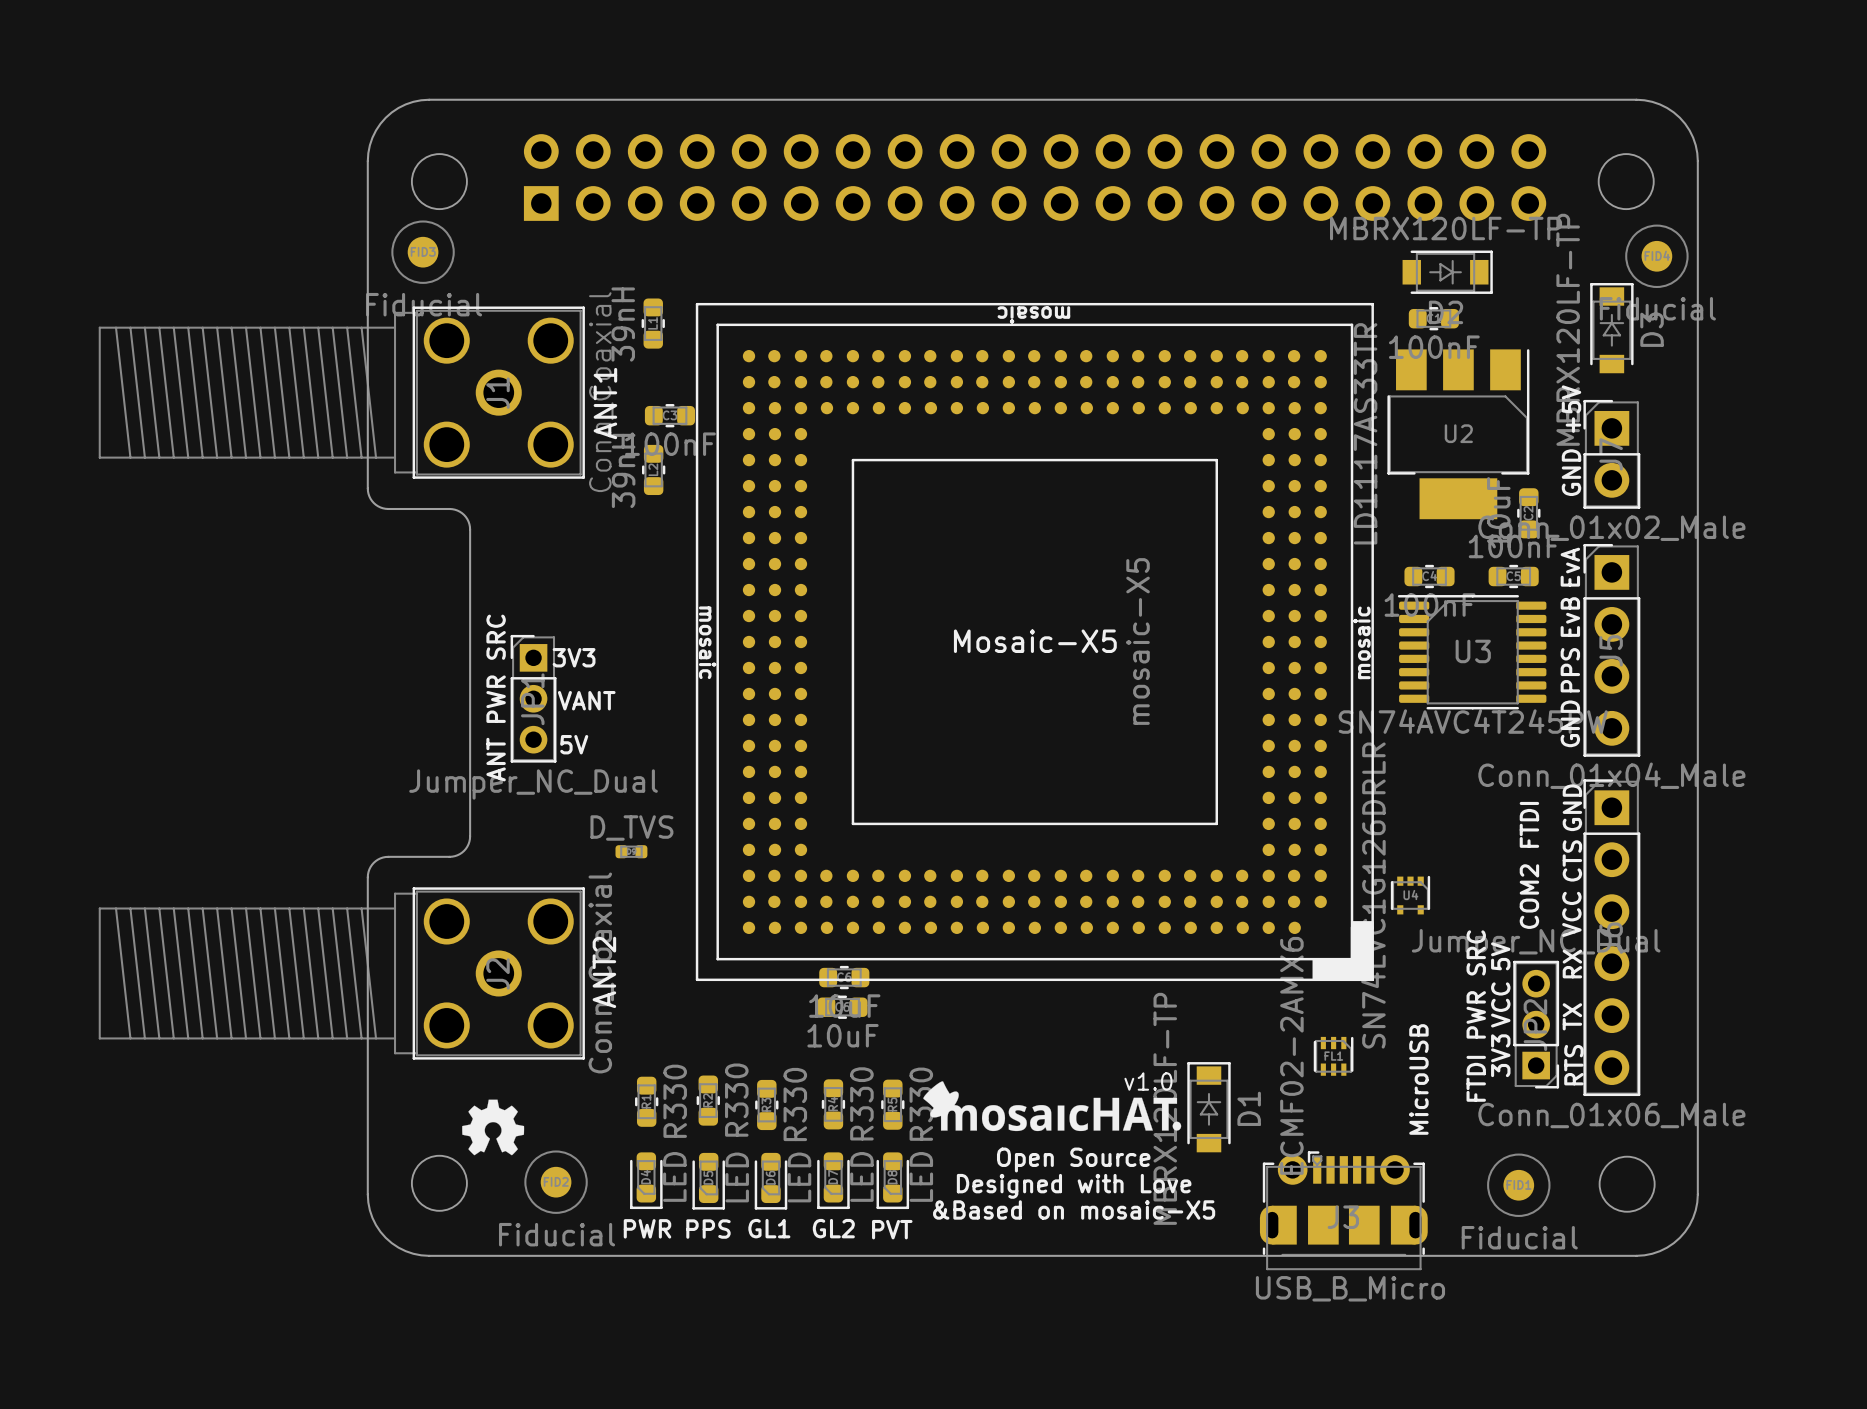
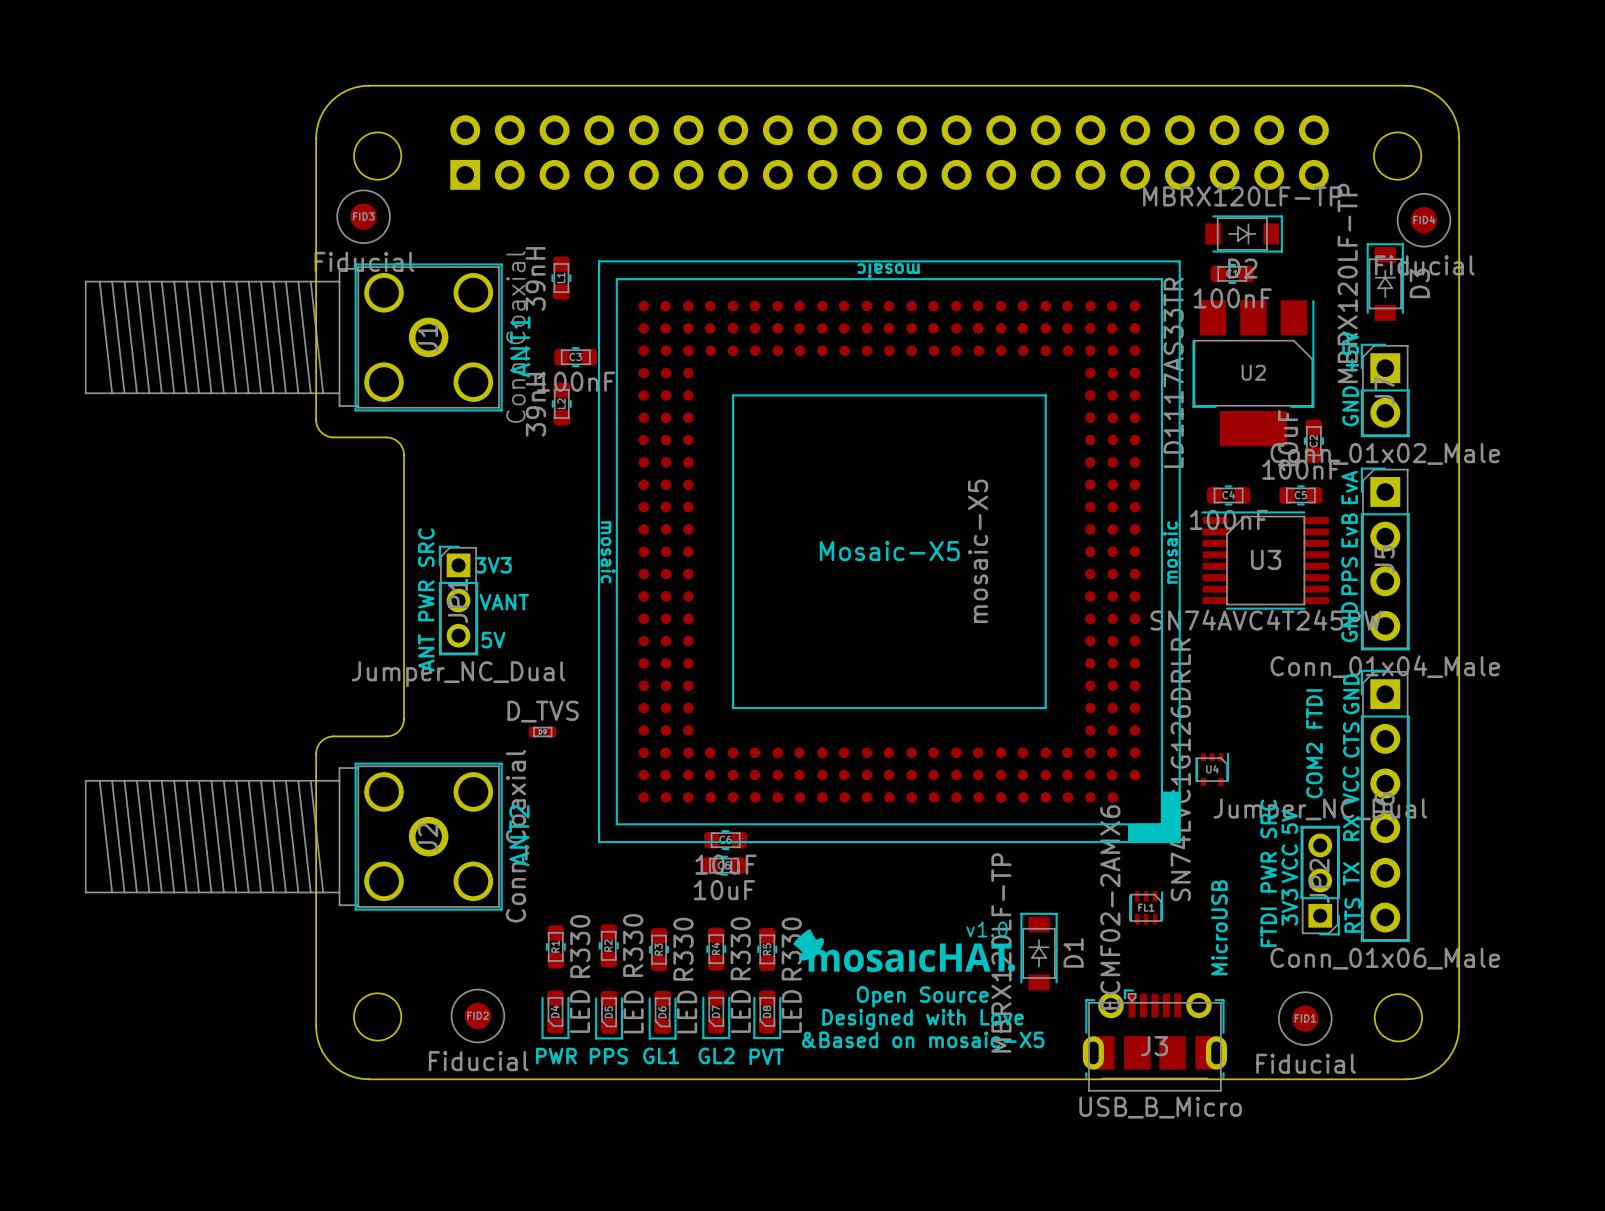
drawing: [462, 1099, 525, 1156] -> none

